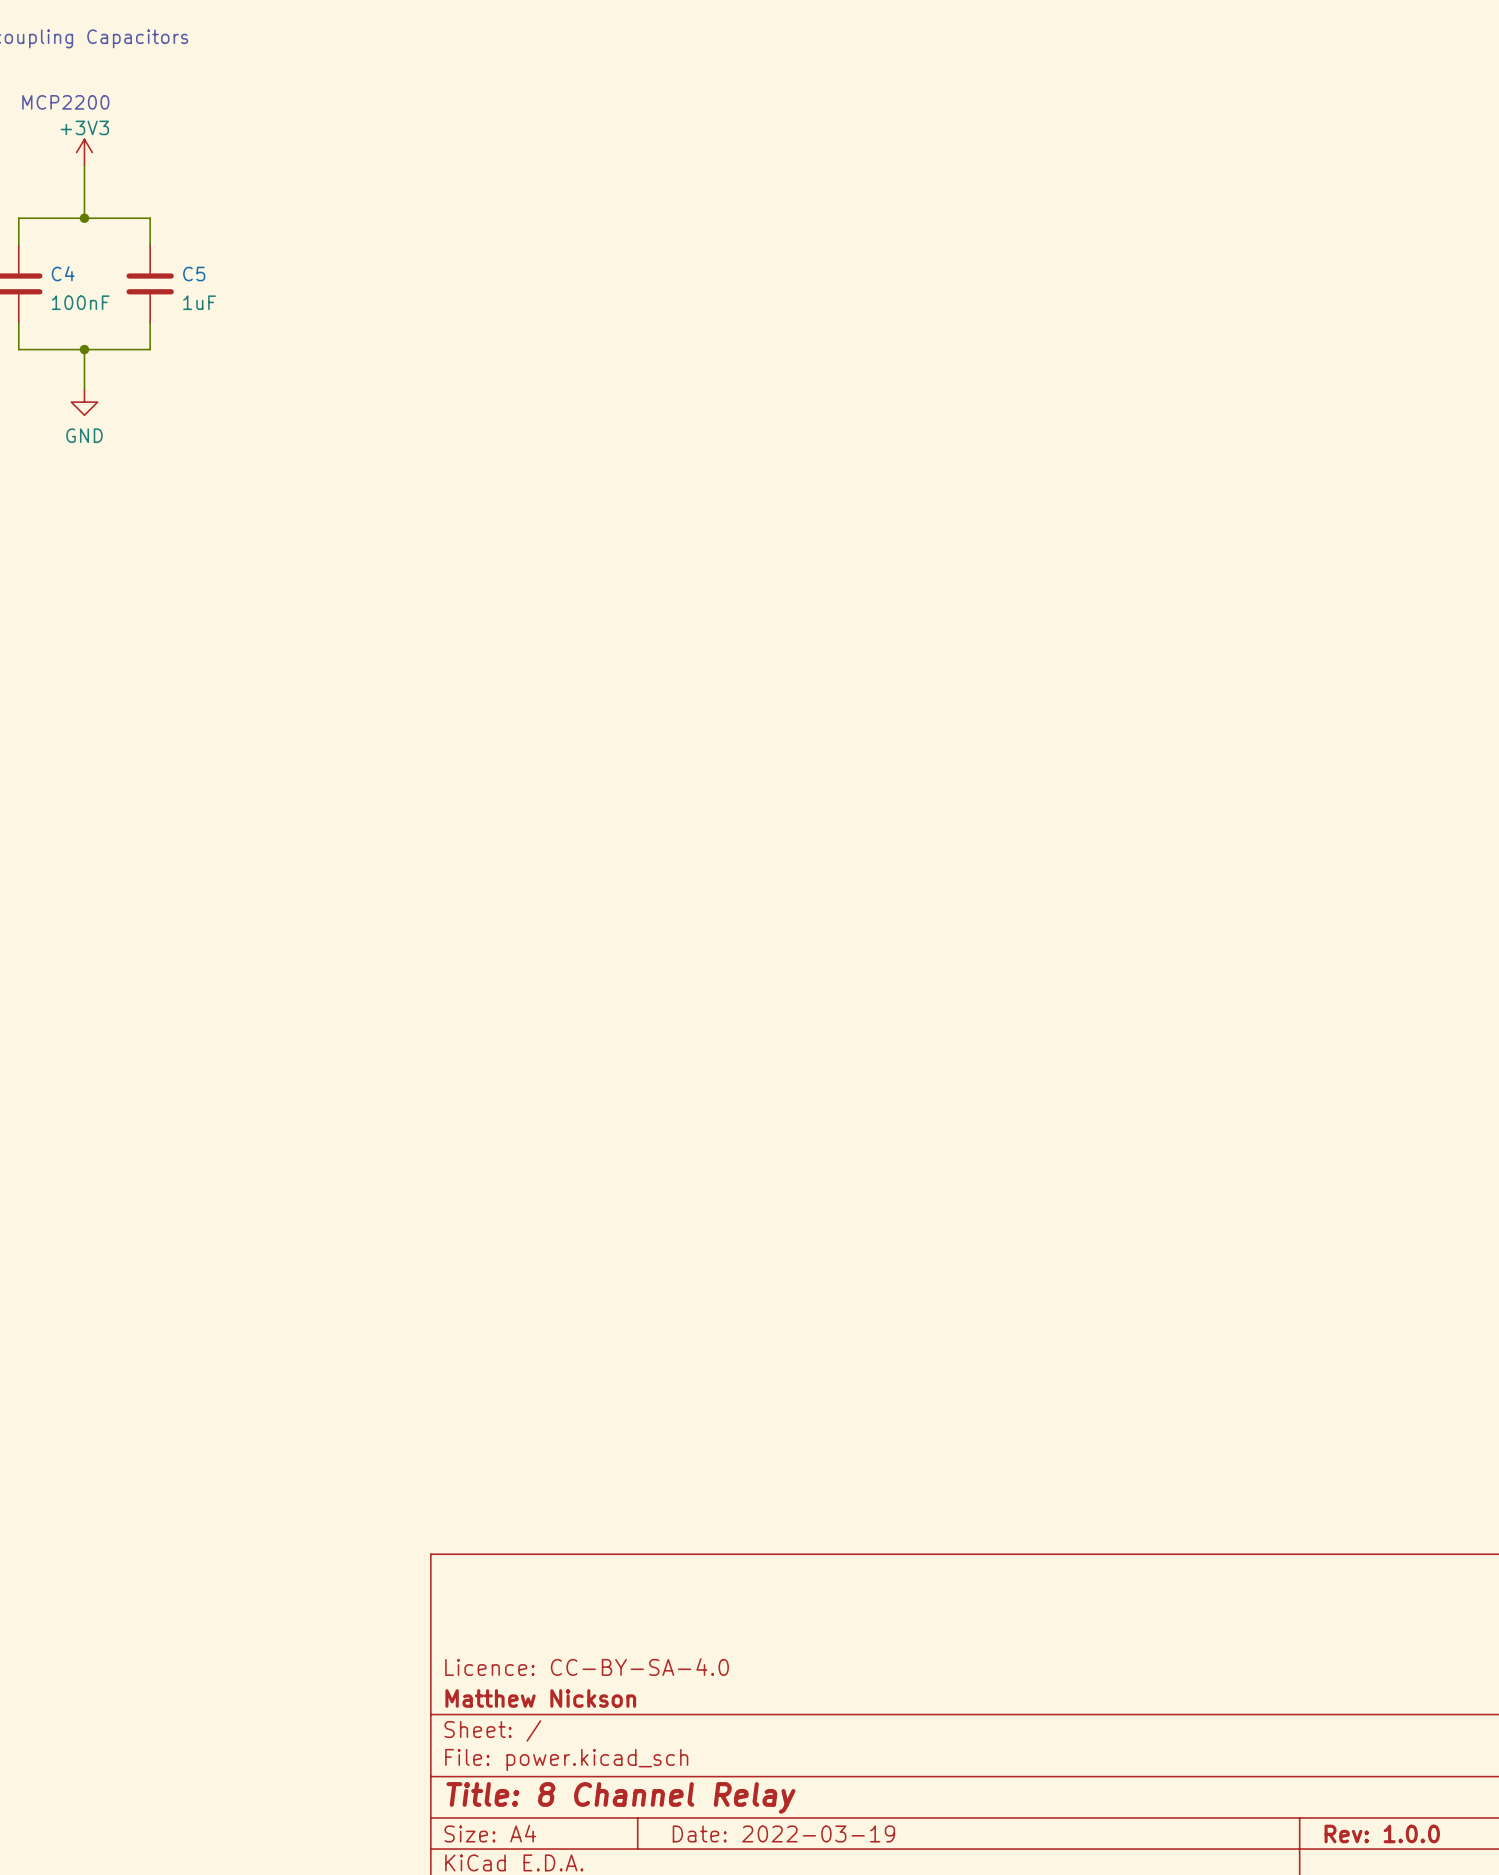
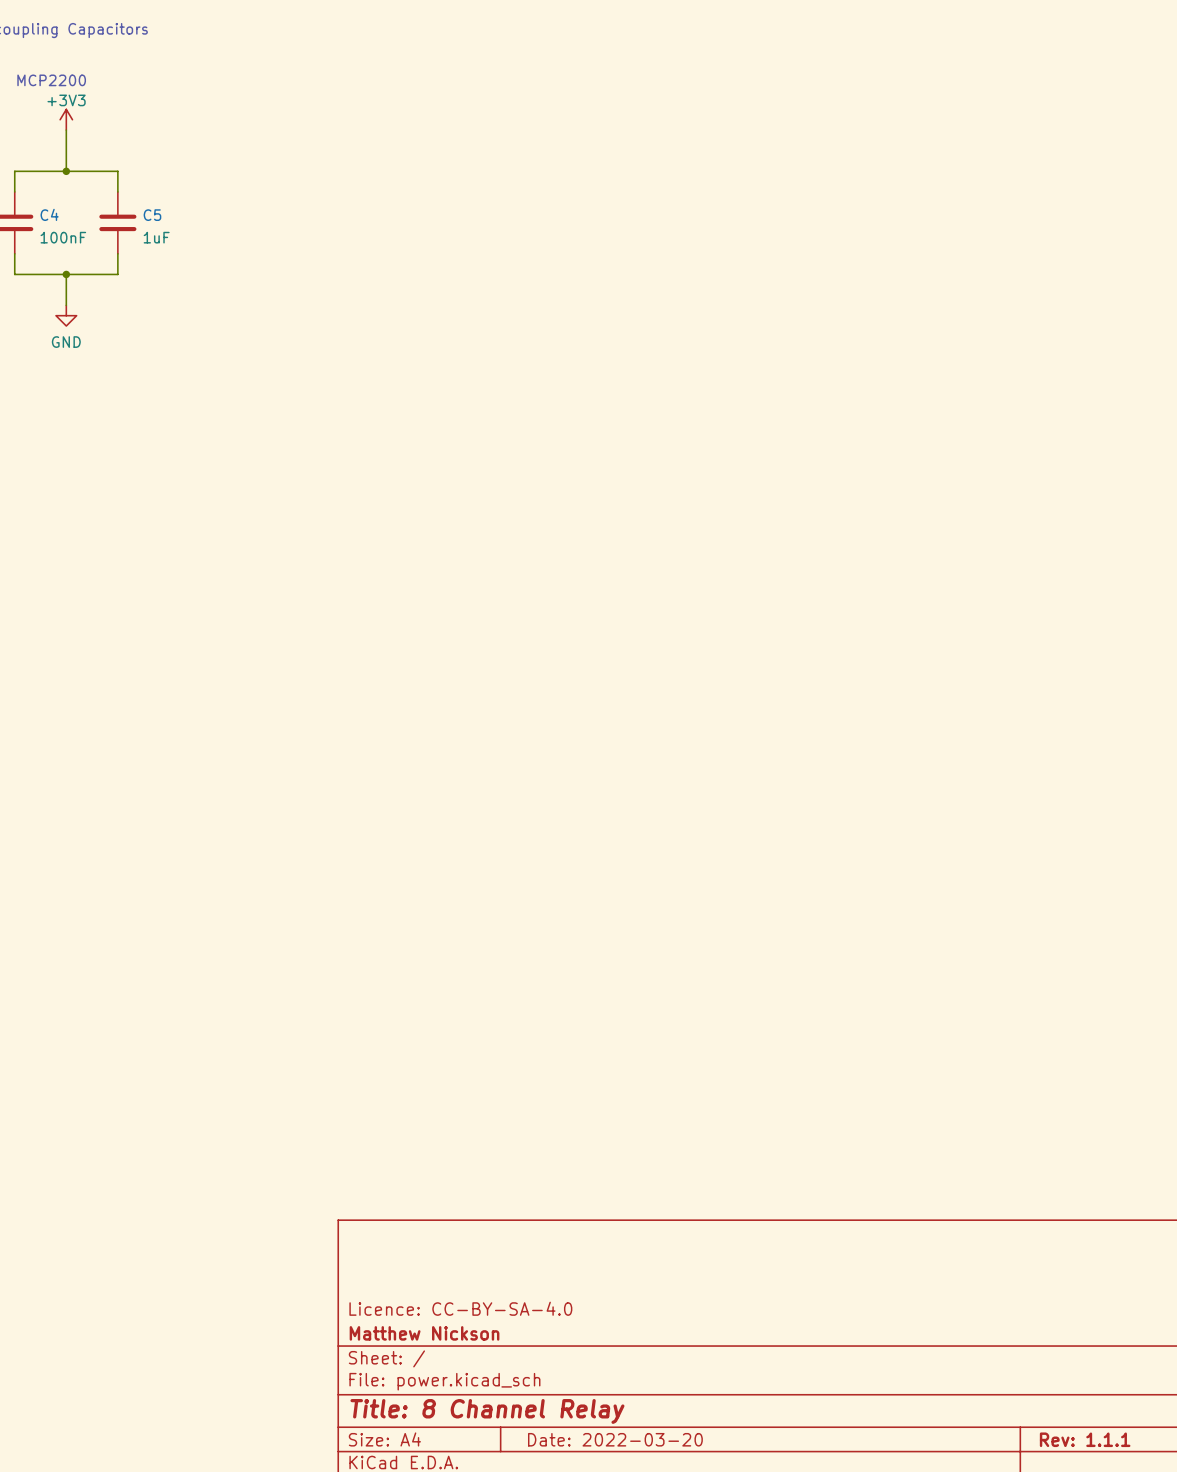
title block: Date: 2022-03-19 (783, 1833) -> Date: 2022-03-20 (615, 1439)
title block: Rev: 1.0.0 (1382, 1833) -> Rev: 1.1.1 (1085, 1439)

